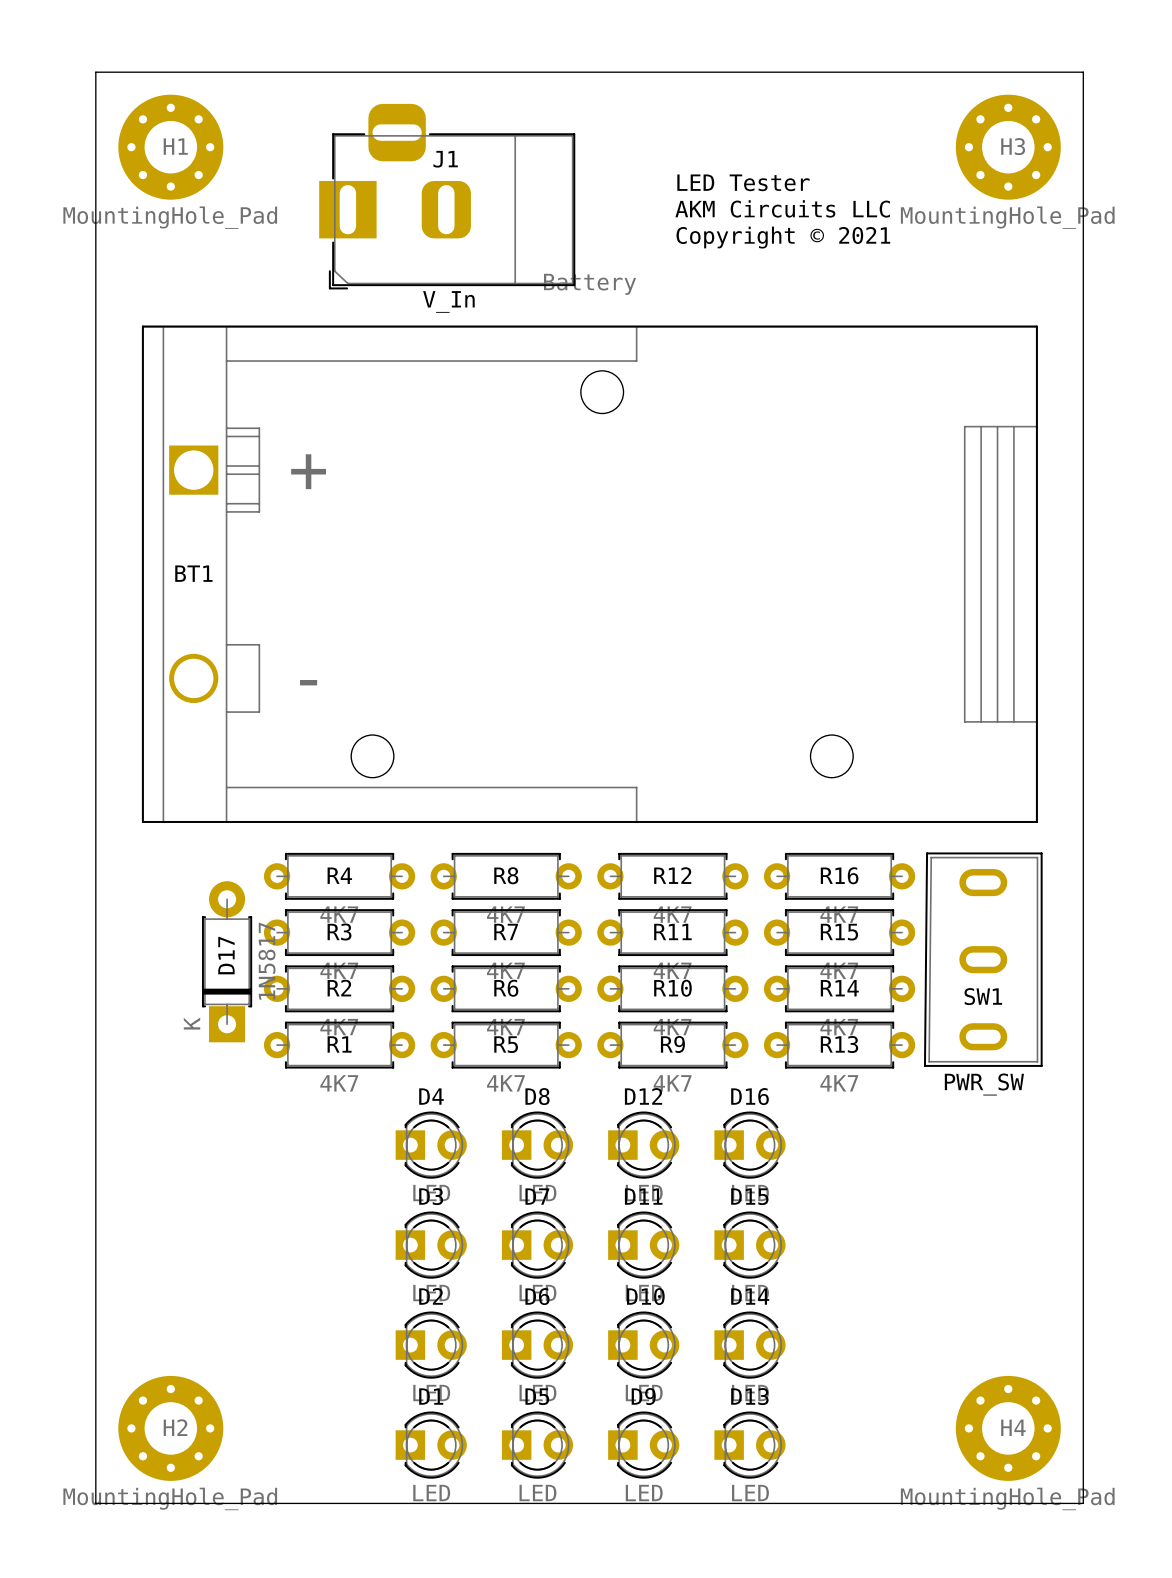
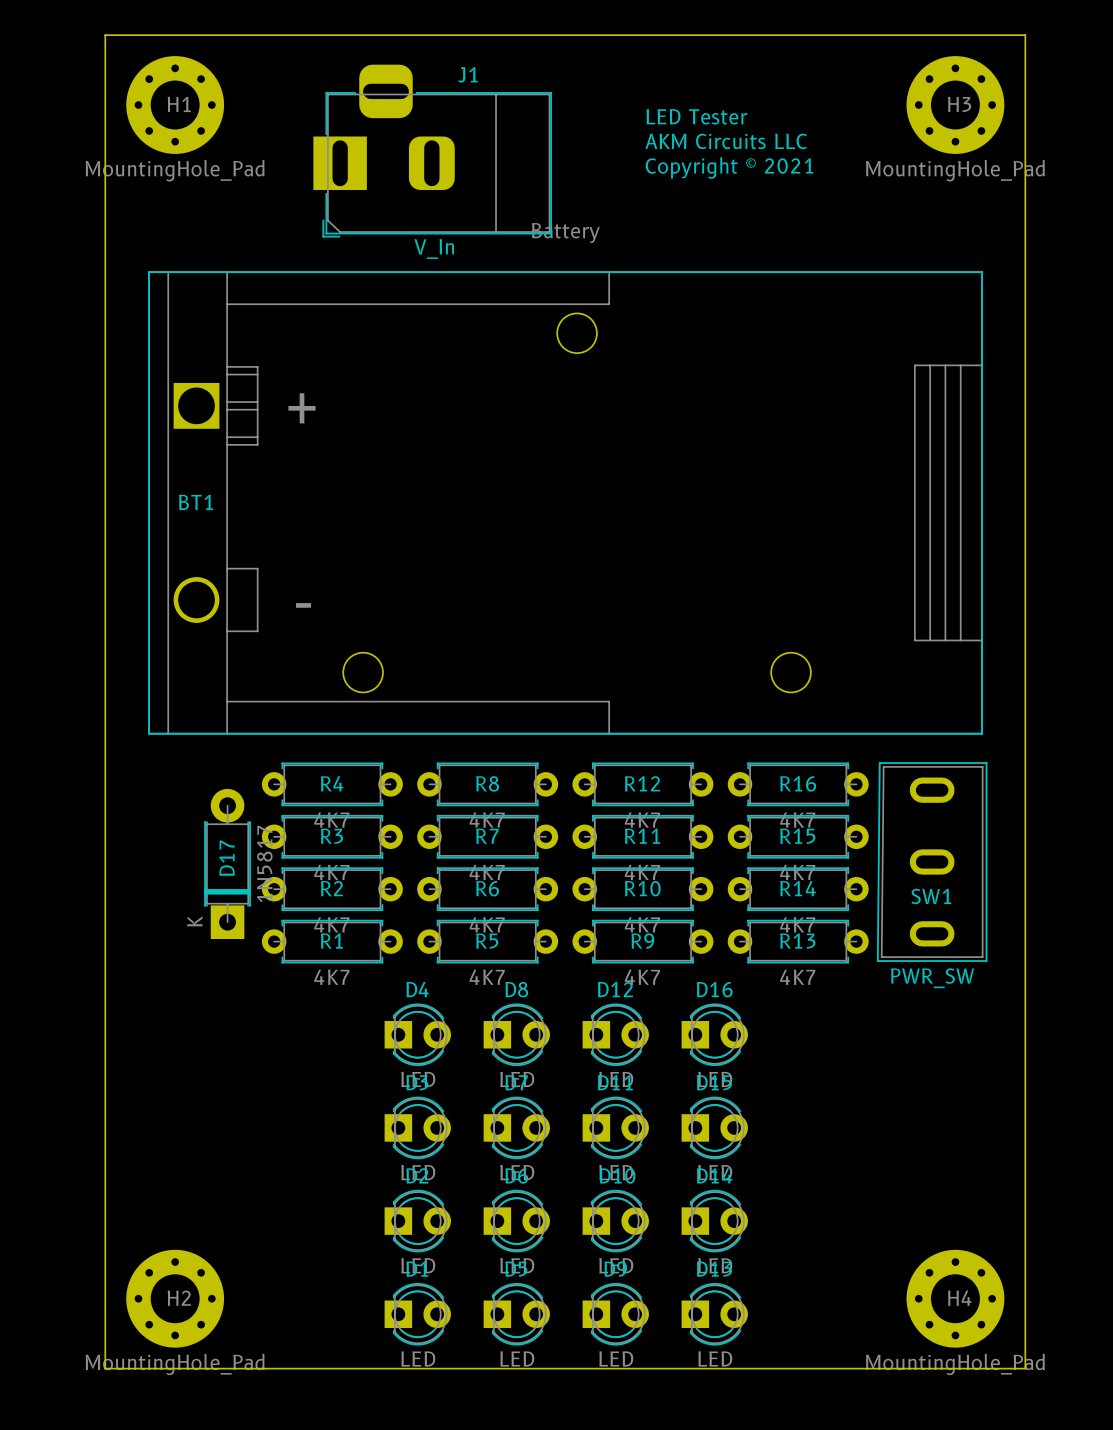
J1 name position: J1 (445, 159) -> J1 (468, 74)
text: none -> LED Tester (696, 116)
text: LED Tester (743, 182) -> AKM Circuits LLC (726, 141)
text: AKM Circuits LLC (782, 208) -> Copyright © 2021 (729, 168)
text: Copyright © 2021 (783, 237) -> none

